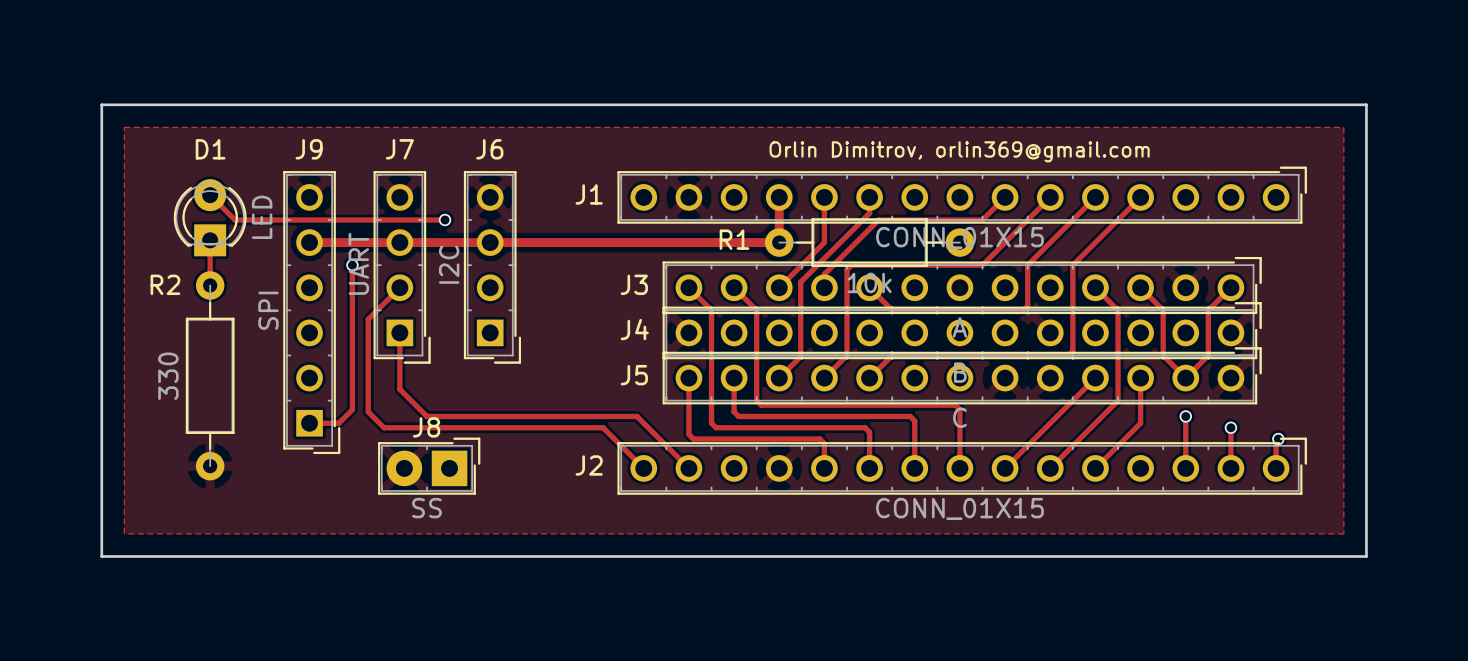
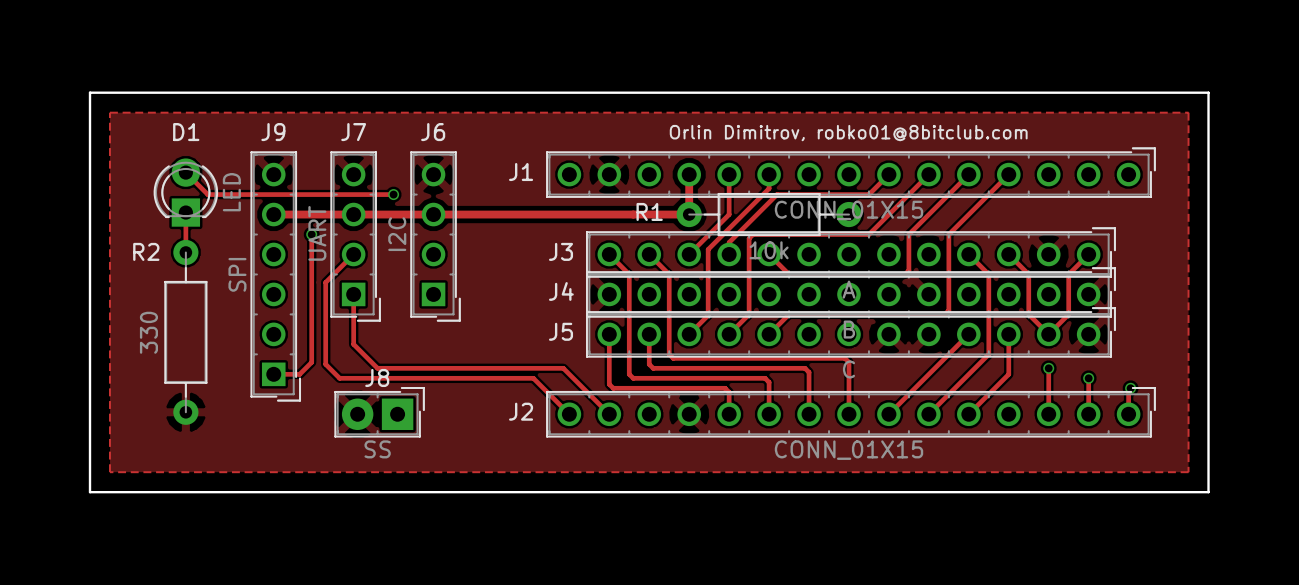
text: Orlin Dimitrov, orlin369@gmail.com (959, 151) -> Orlin Dimitrov, robko01@8bitclub.com (848, 133)

